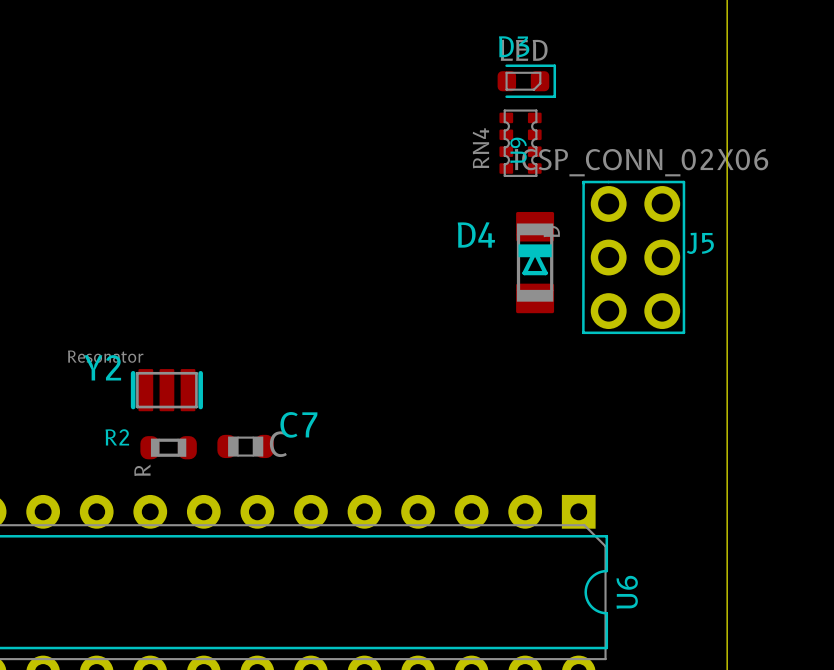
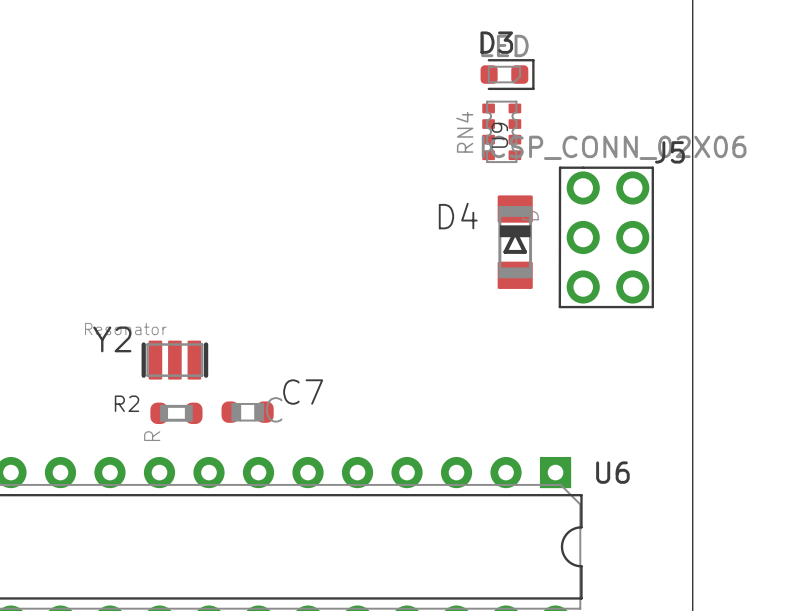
J5 name position: J5 (700, 243) -> J5 (669, 152)
U6 name rotation: 0° (627, 592) -> 90° clockwise (612, 472)
U6 name position: U6 (627, 592) -> U6 (612, 472)

